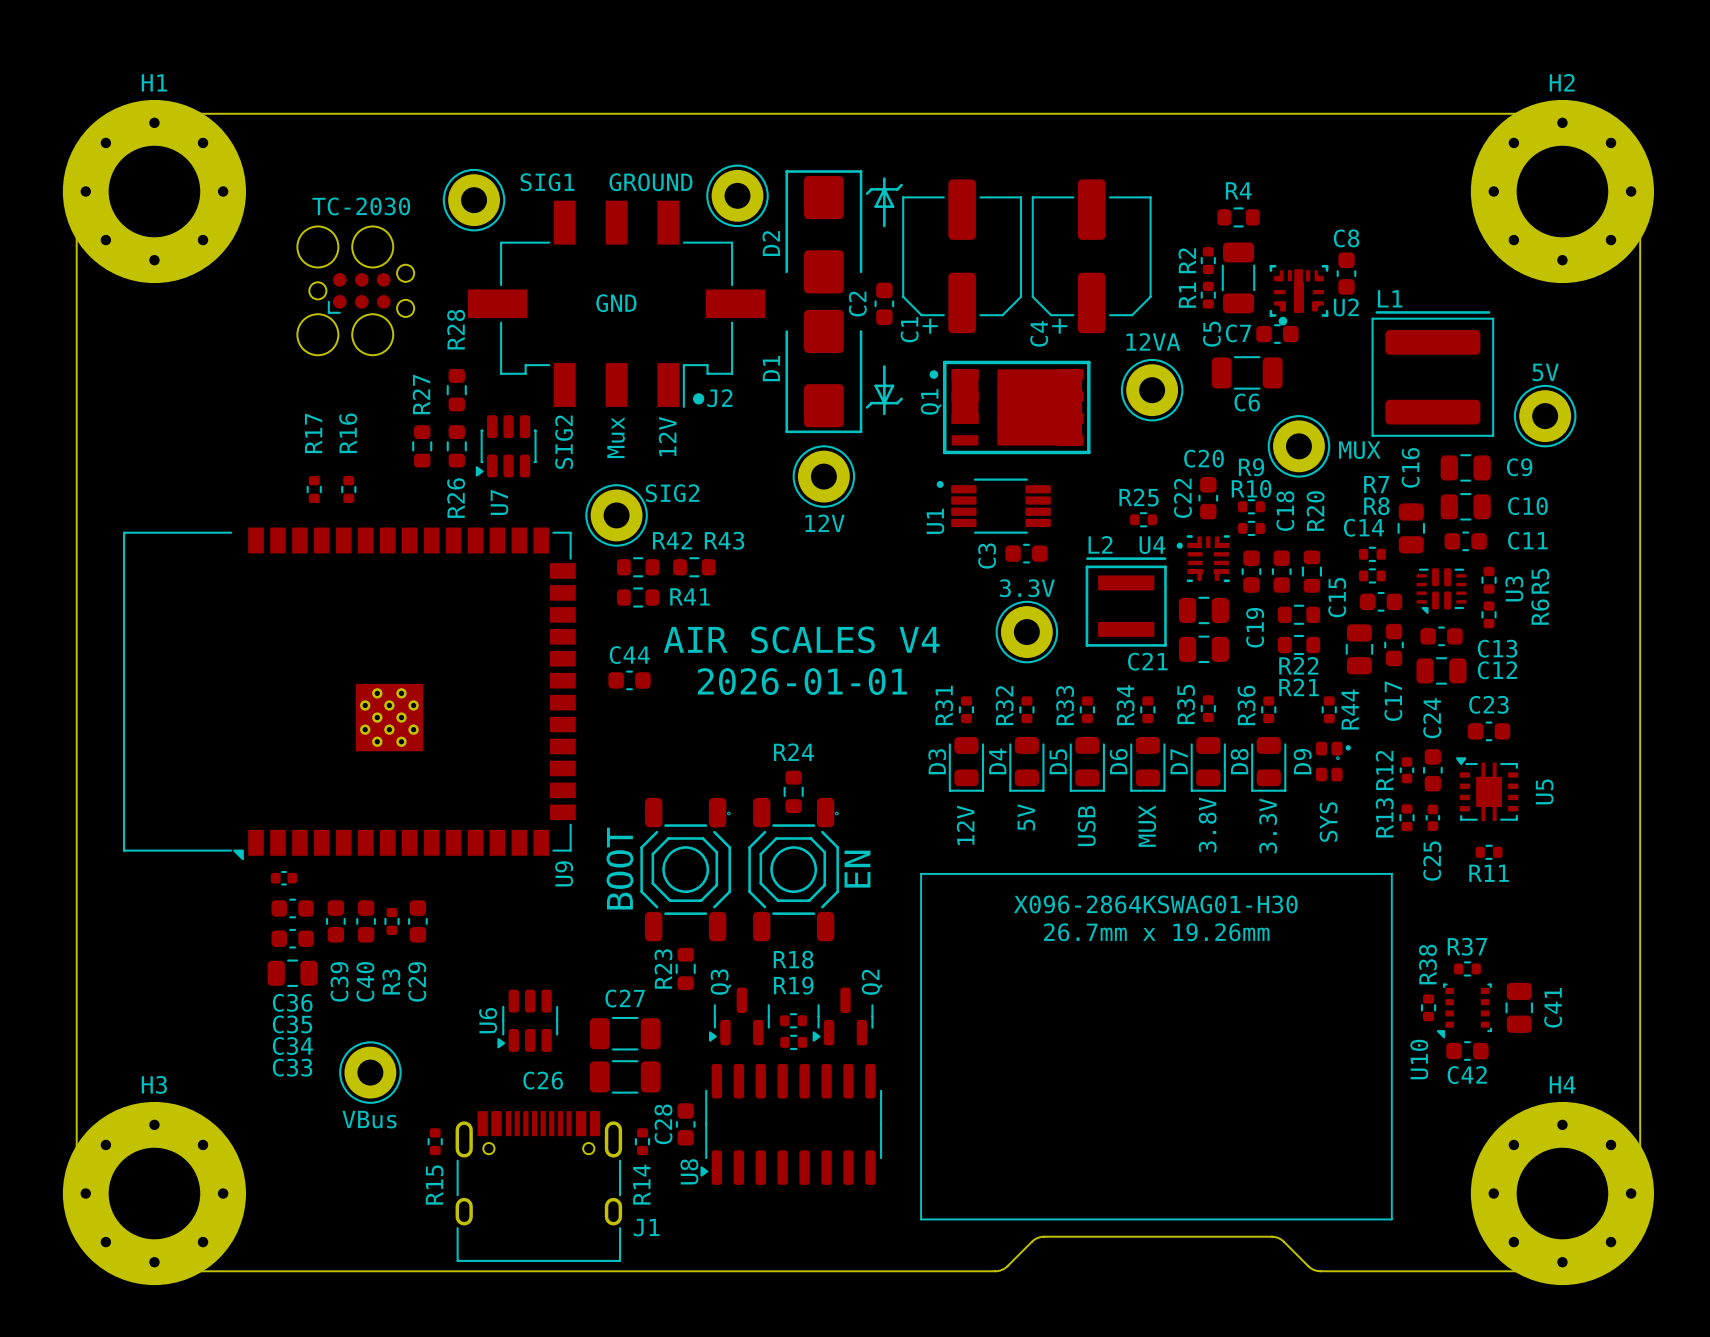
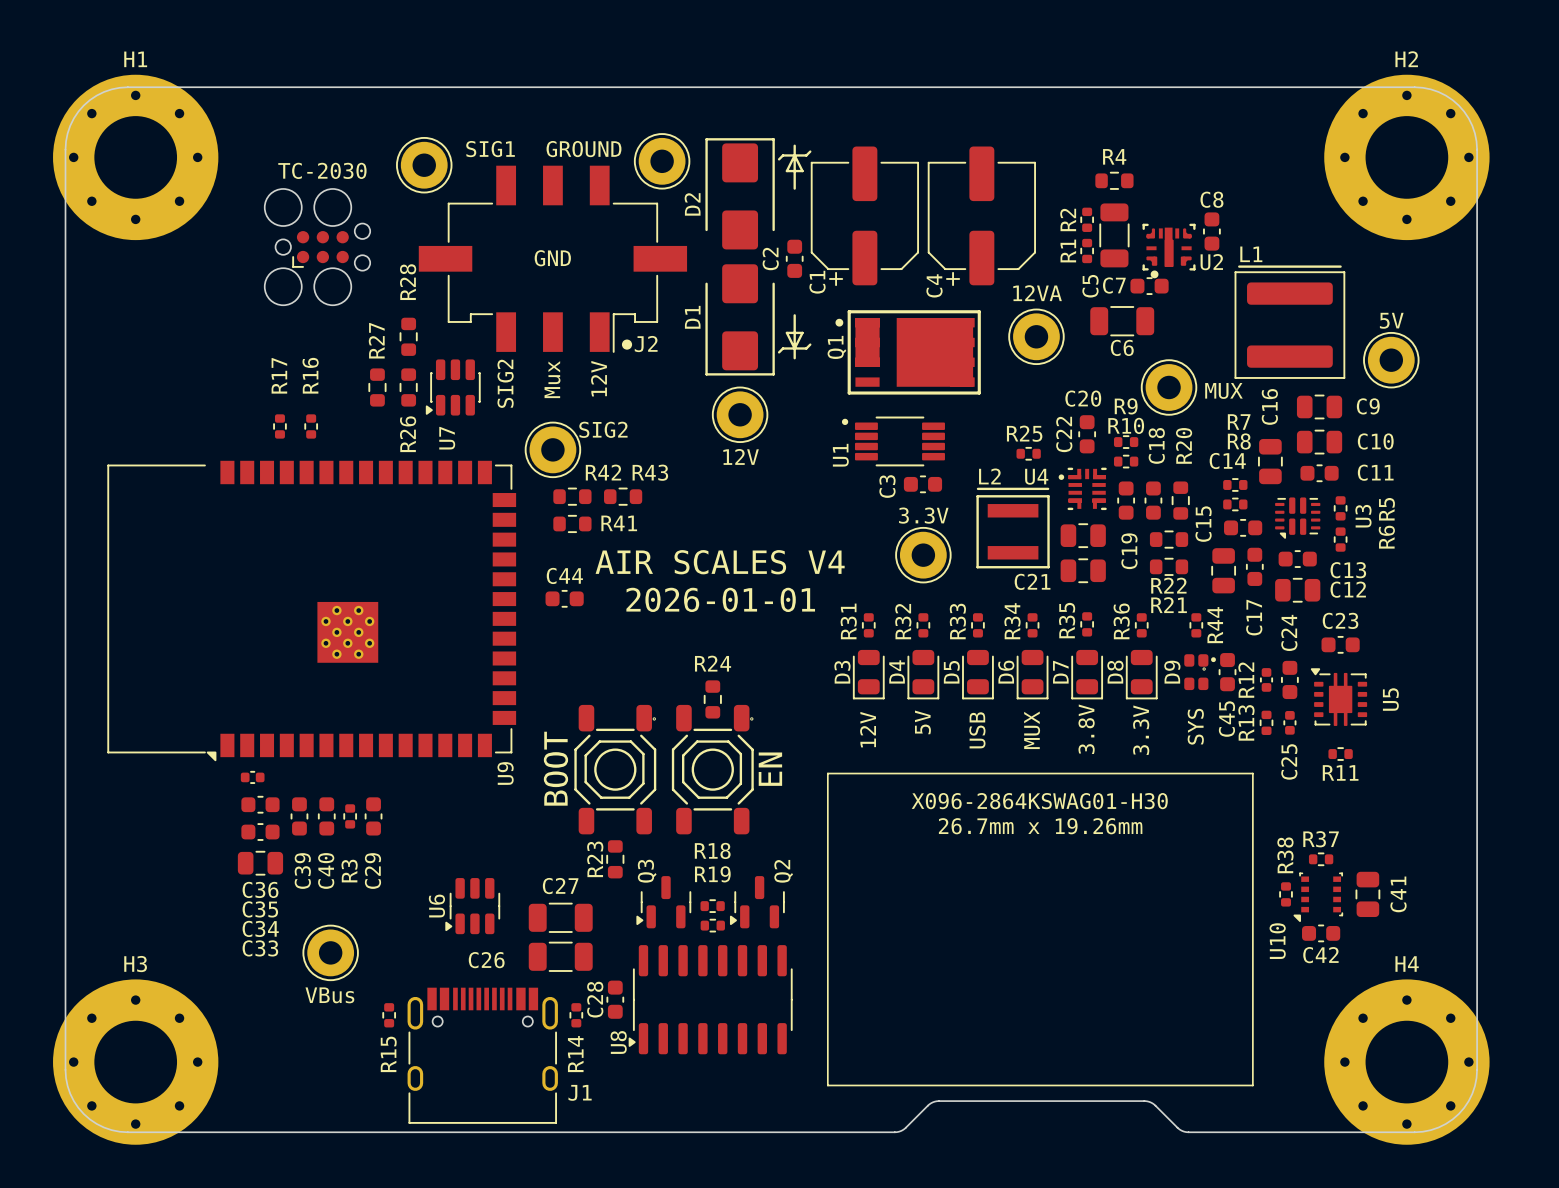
C45: none -> (1227, 672)

